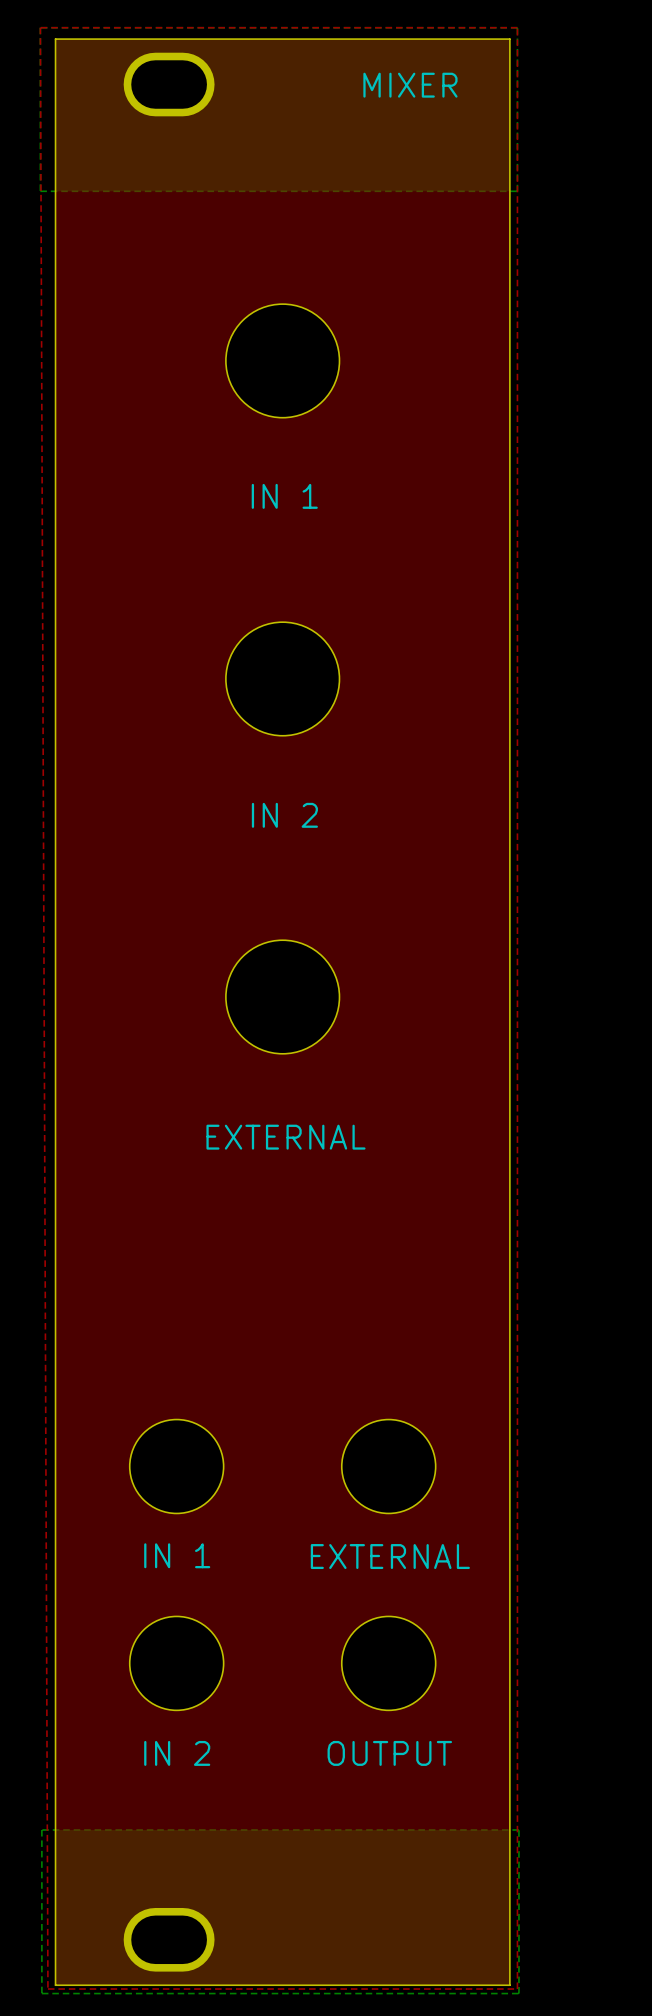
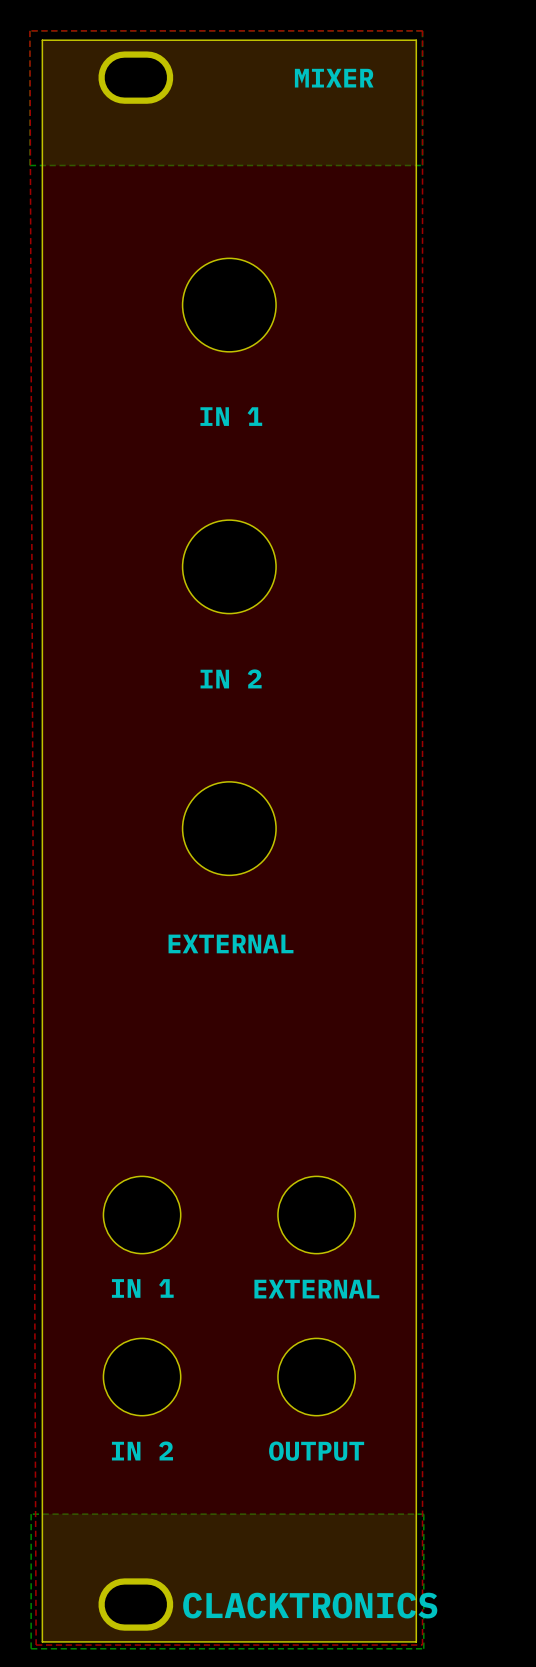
text: none -> CLACKTRONICS (310, 1605)

